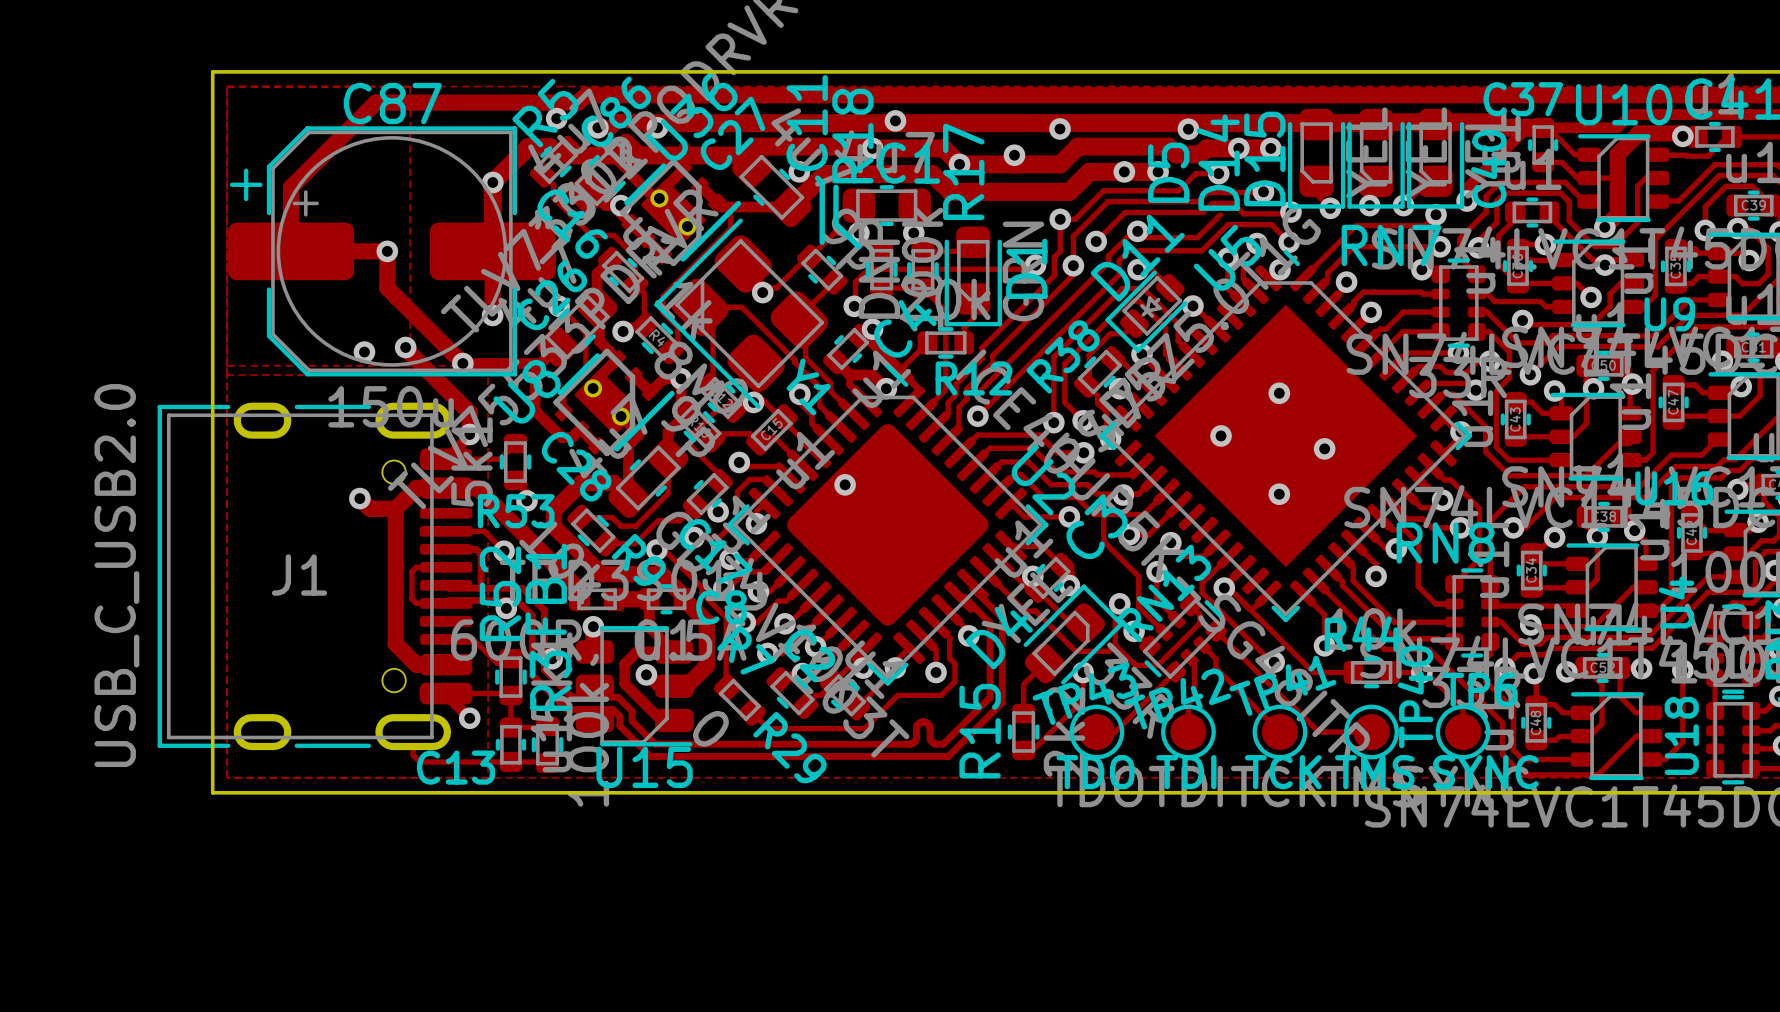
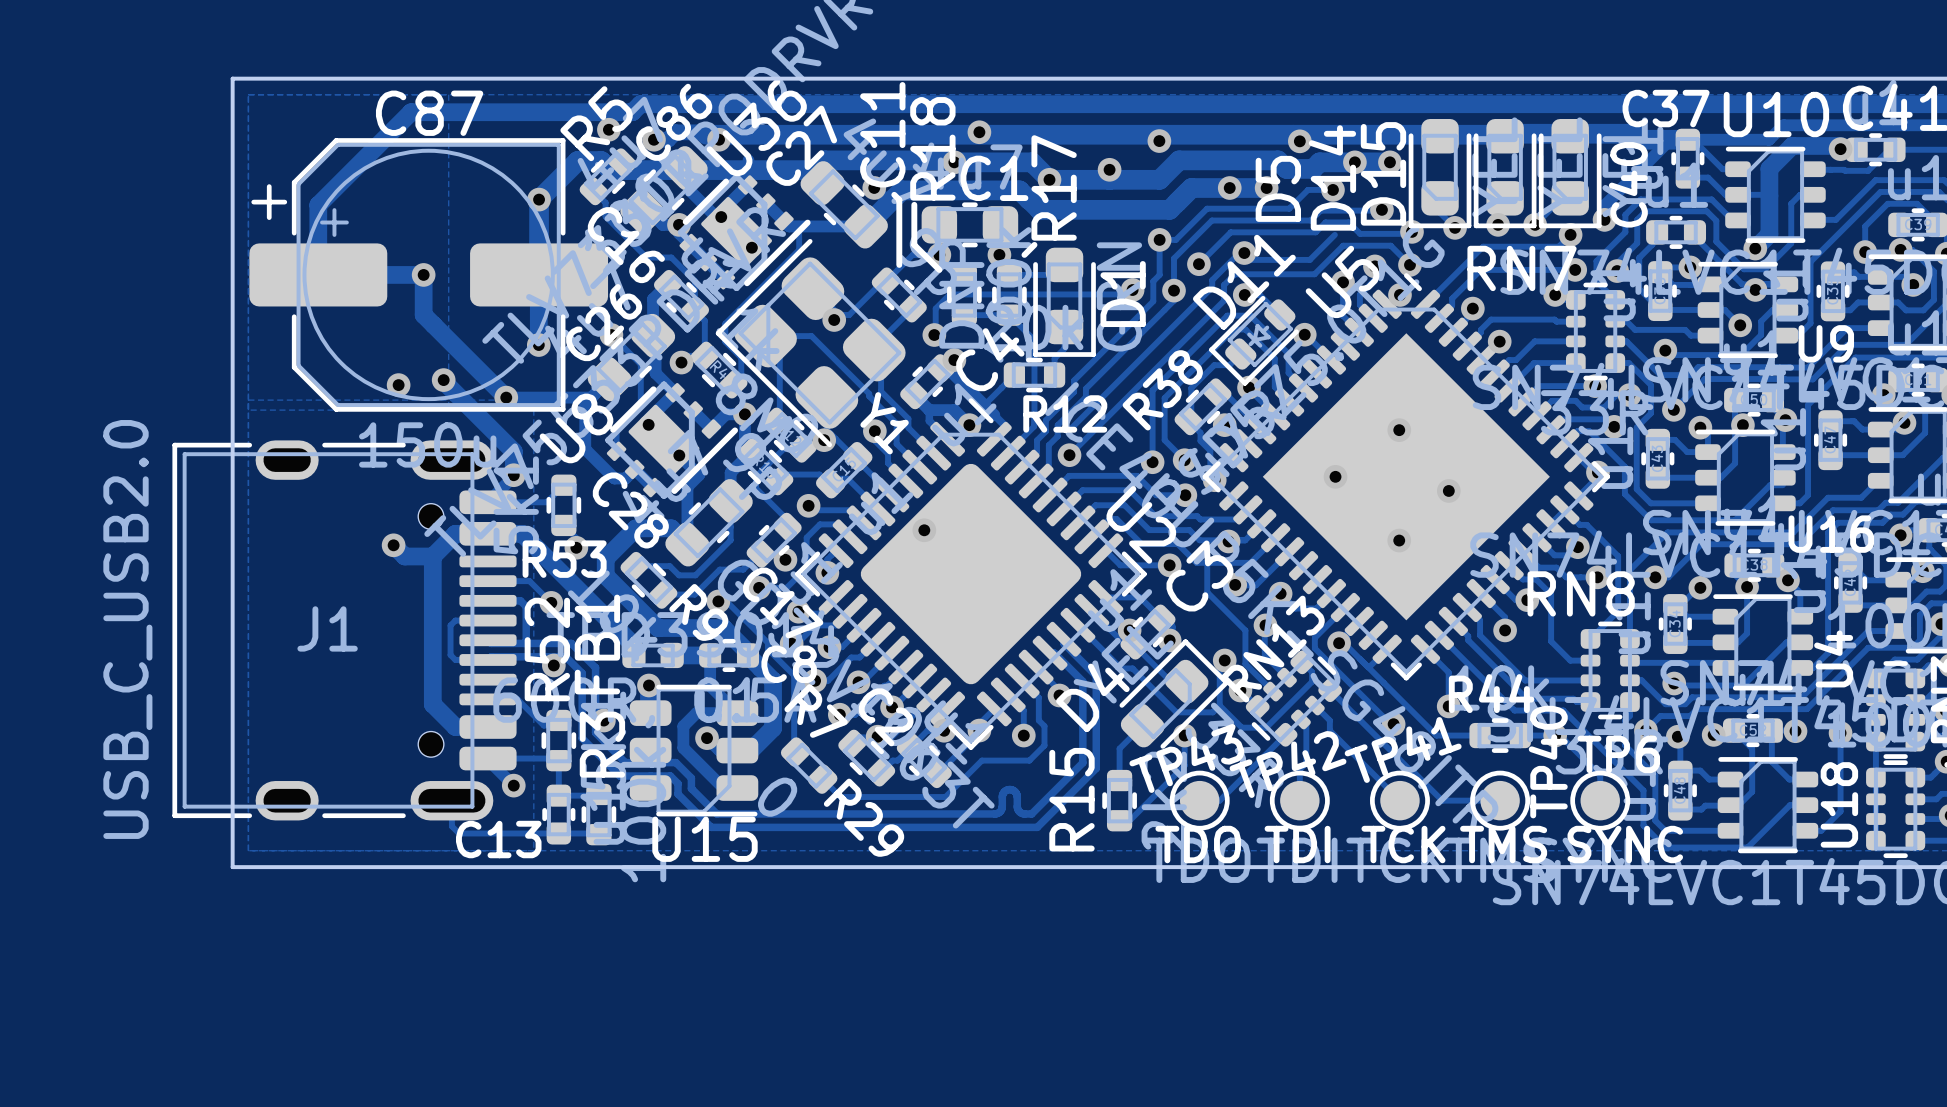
line: none -> (1034, 244) (1024, 254)

